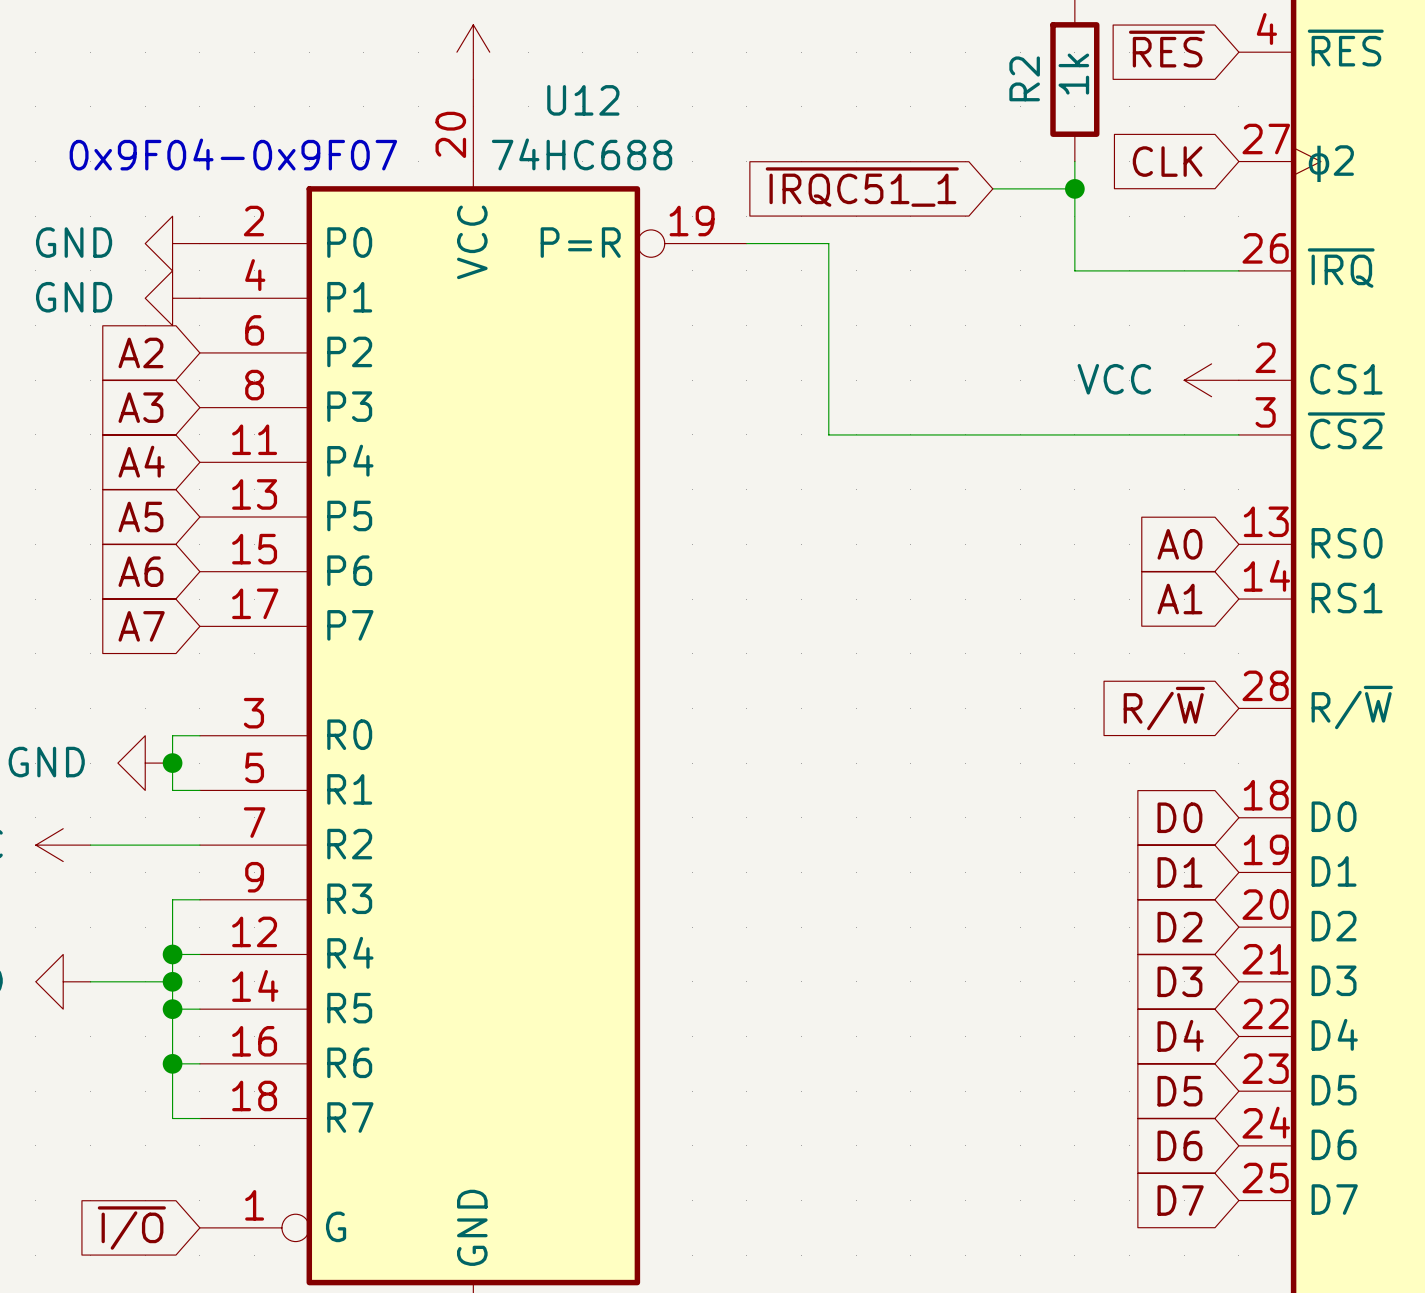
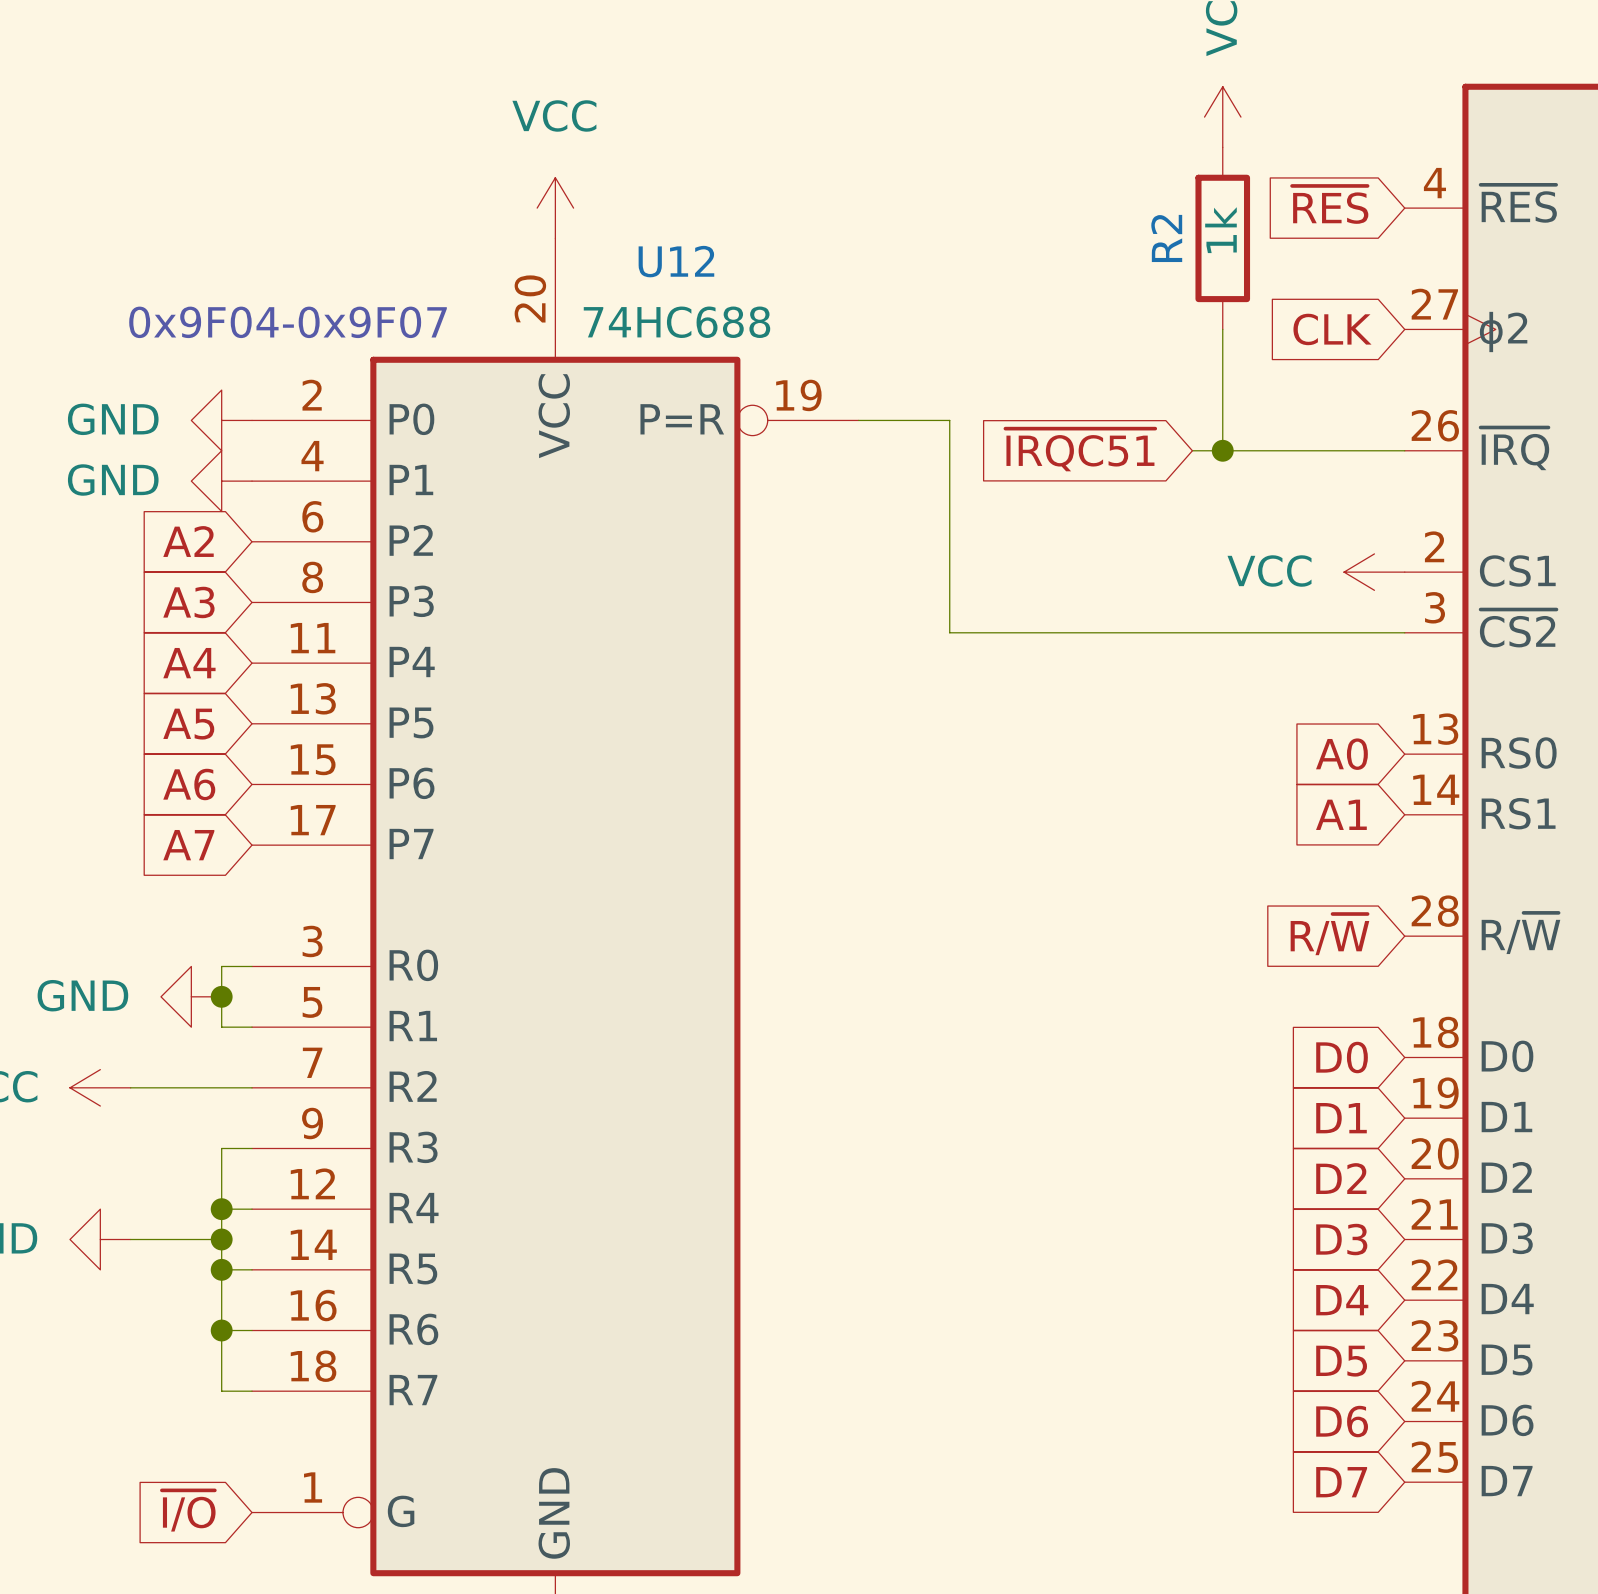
global label: ~{IRQC51_1} (862, 187) -> none
wire: (992, 188) (1074, 188) -> none
junction position: (1074, 188) -> (1222, 450)
global label: none -> ~{IRQC51} (1080, 449)
wire: none -> (1192, 450) (1222, 450)

